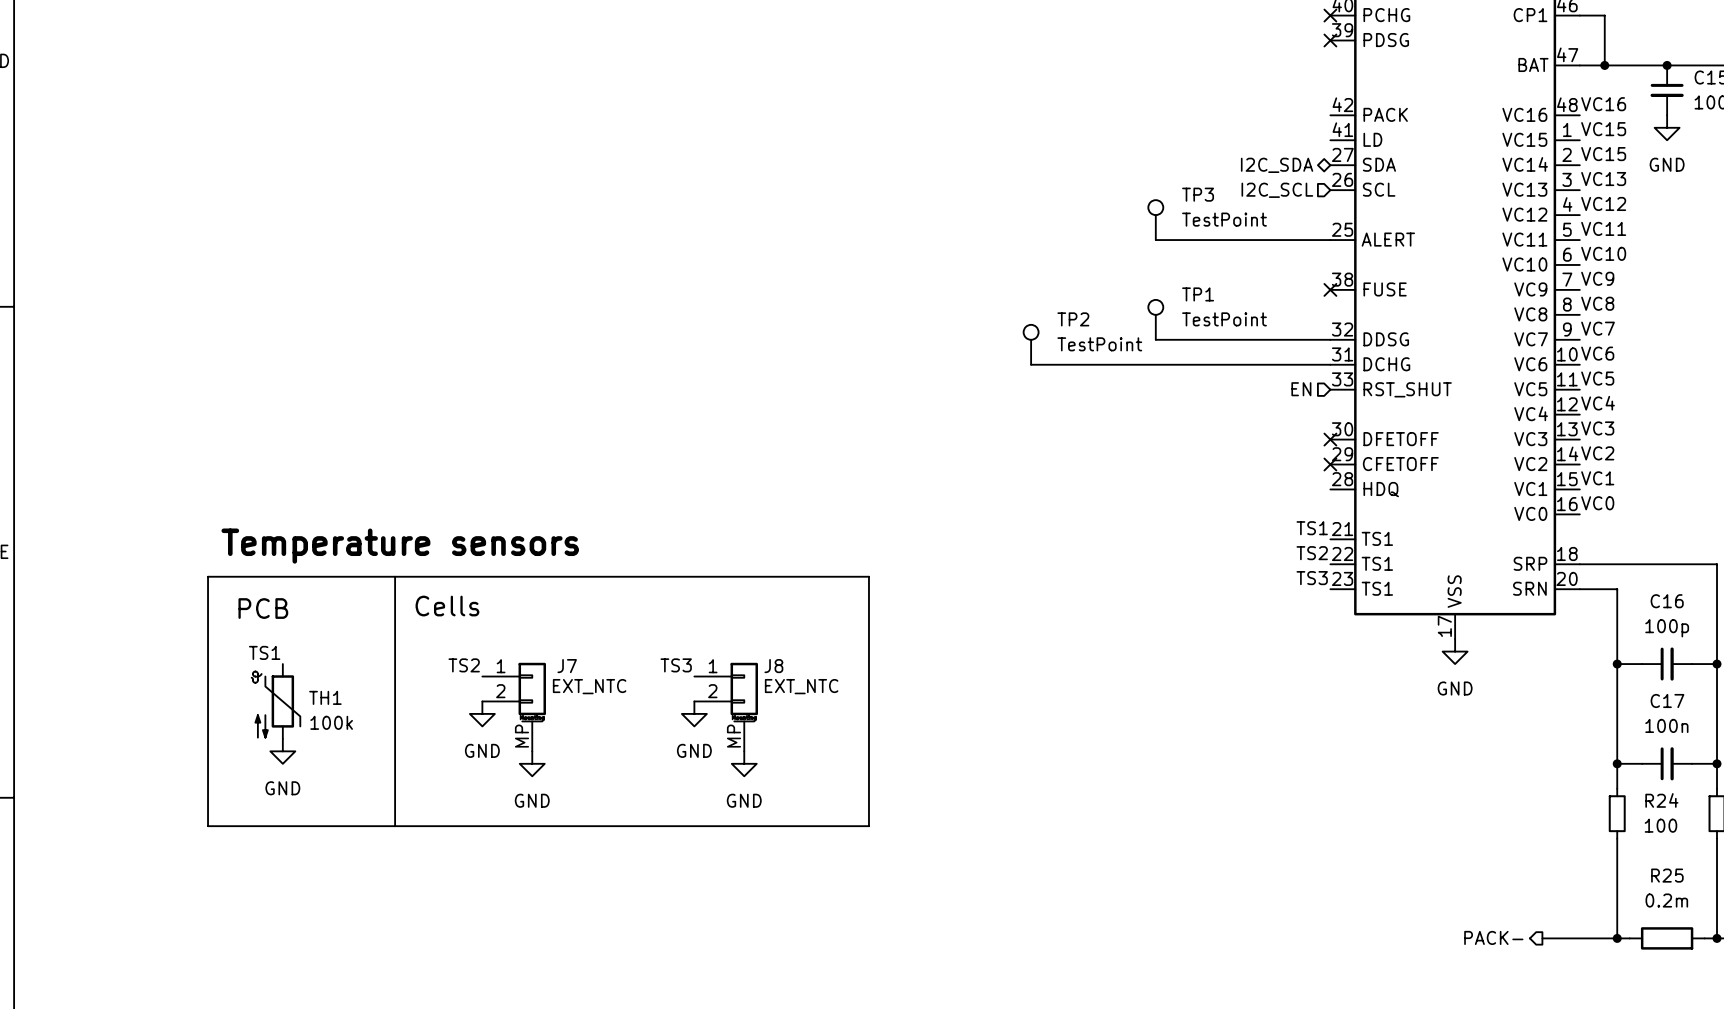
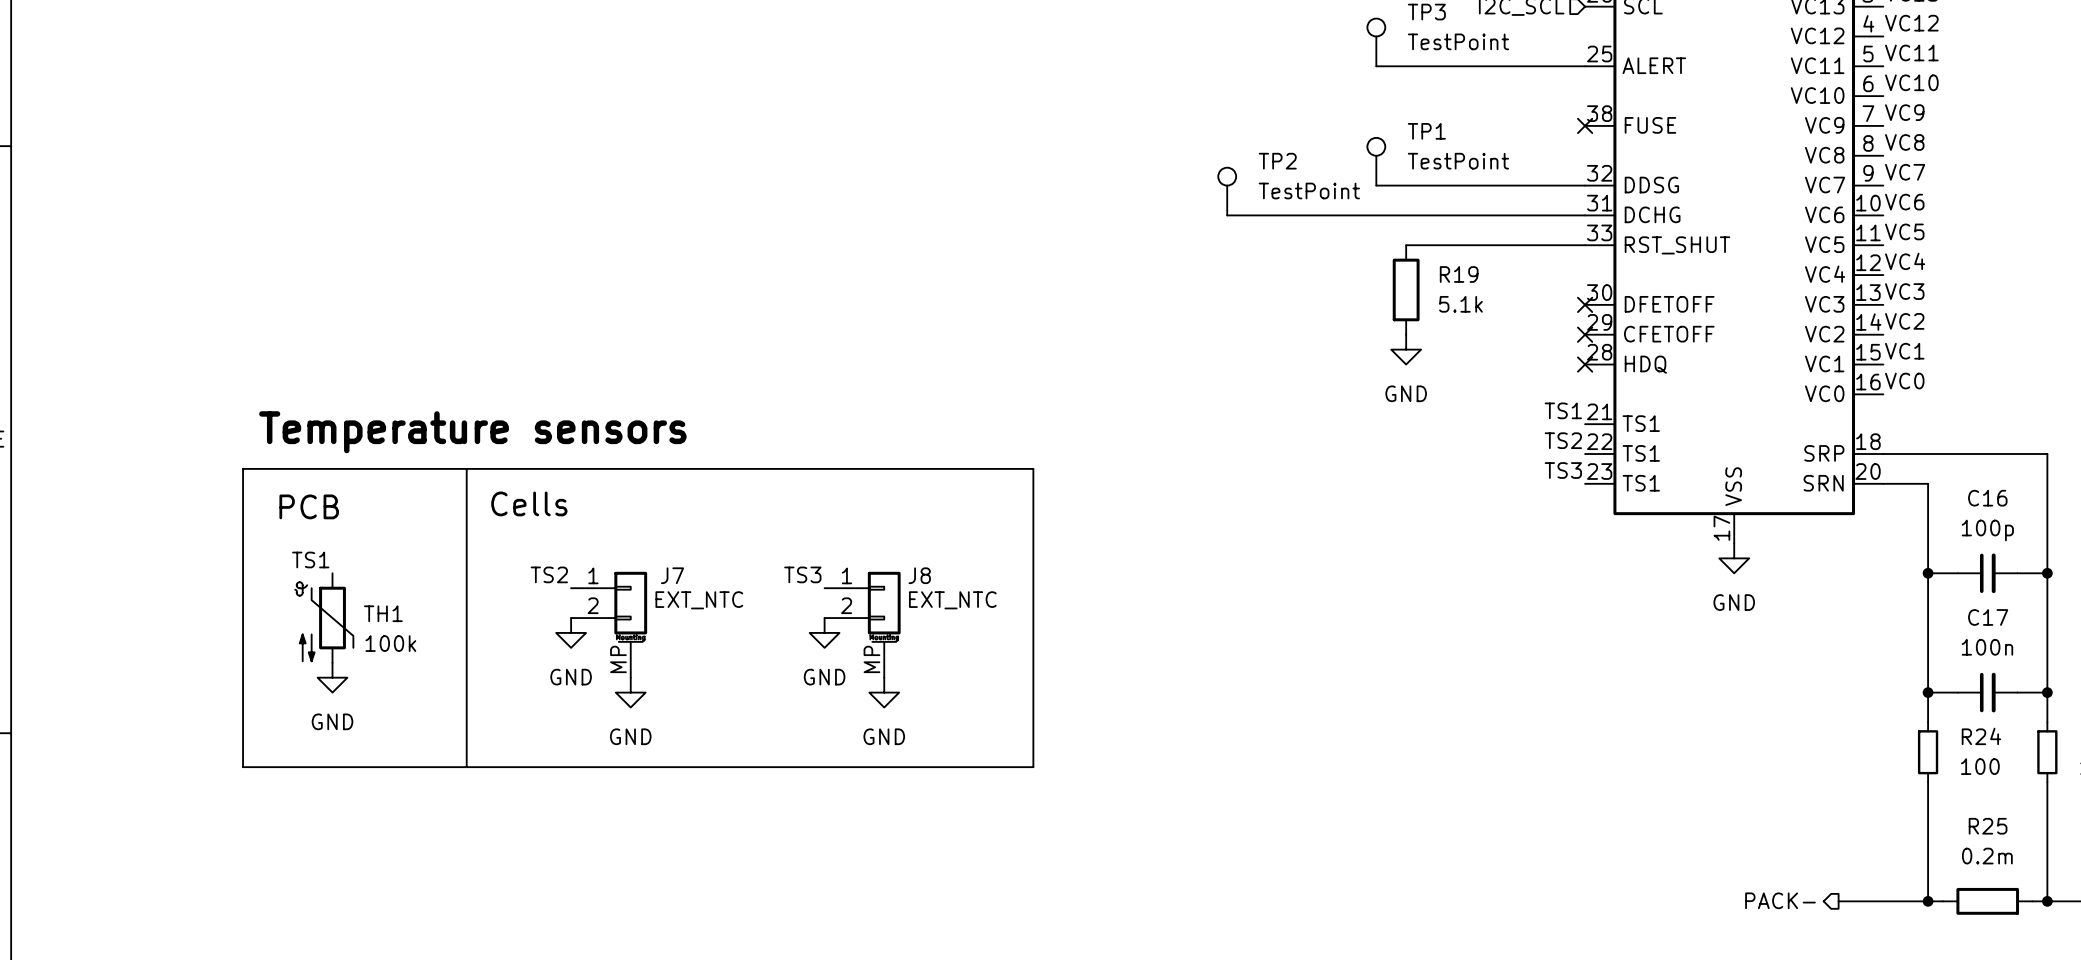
wire: none -> (1406, 245) (1585, 245)
hierarchical label: EN (1301, 389) -> none
R19: none -> 5.1k (1406, 289)
power symbol: none -> GND (1406, 349)
no-connect mark: none -> (1585, 364)

